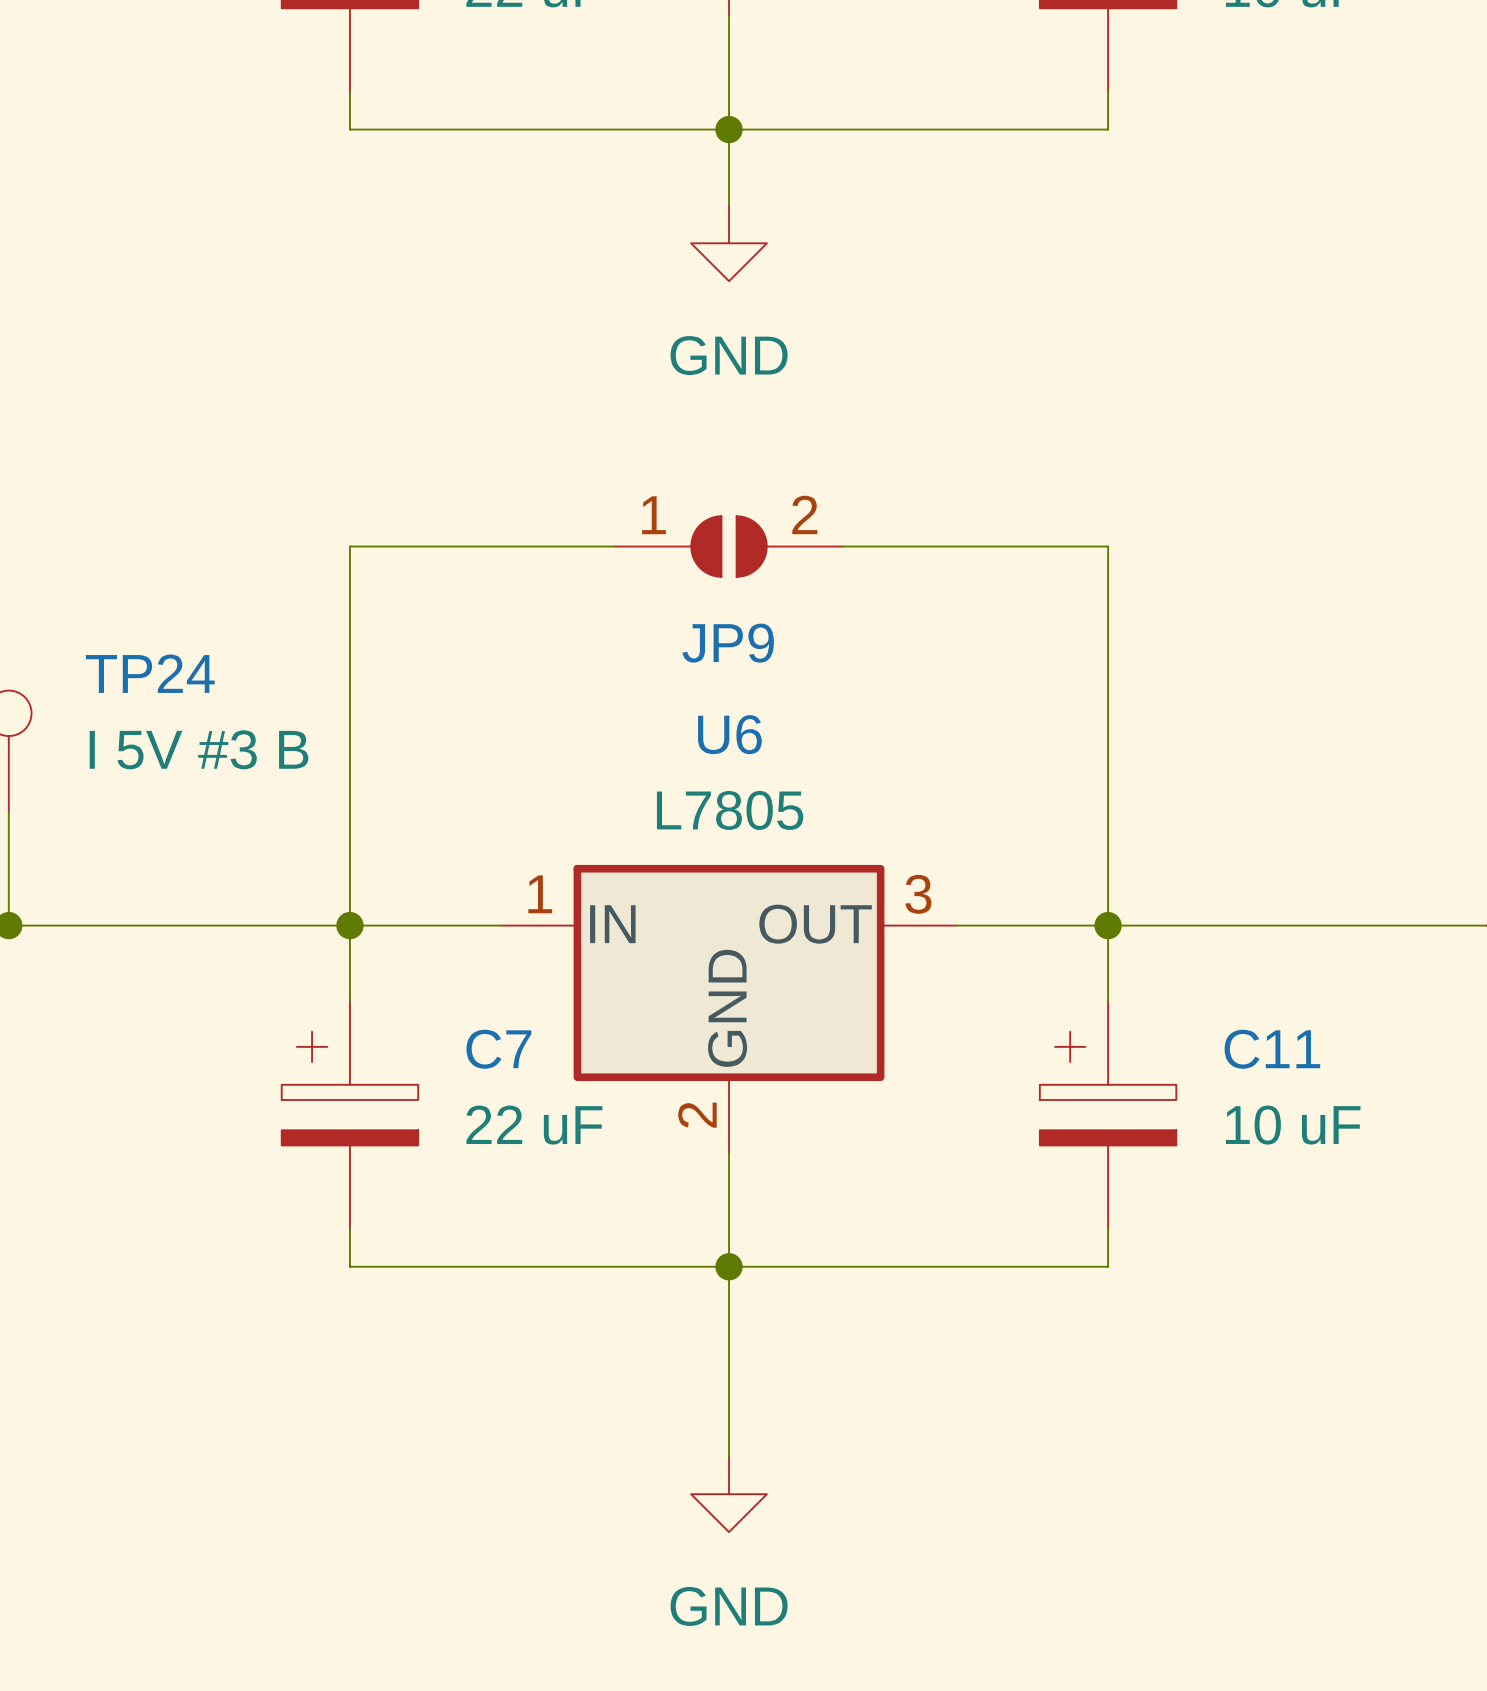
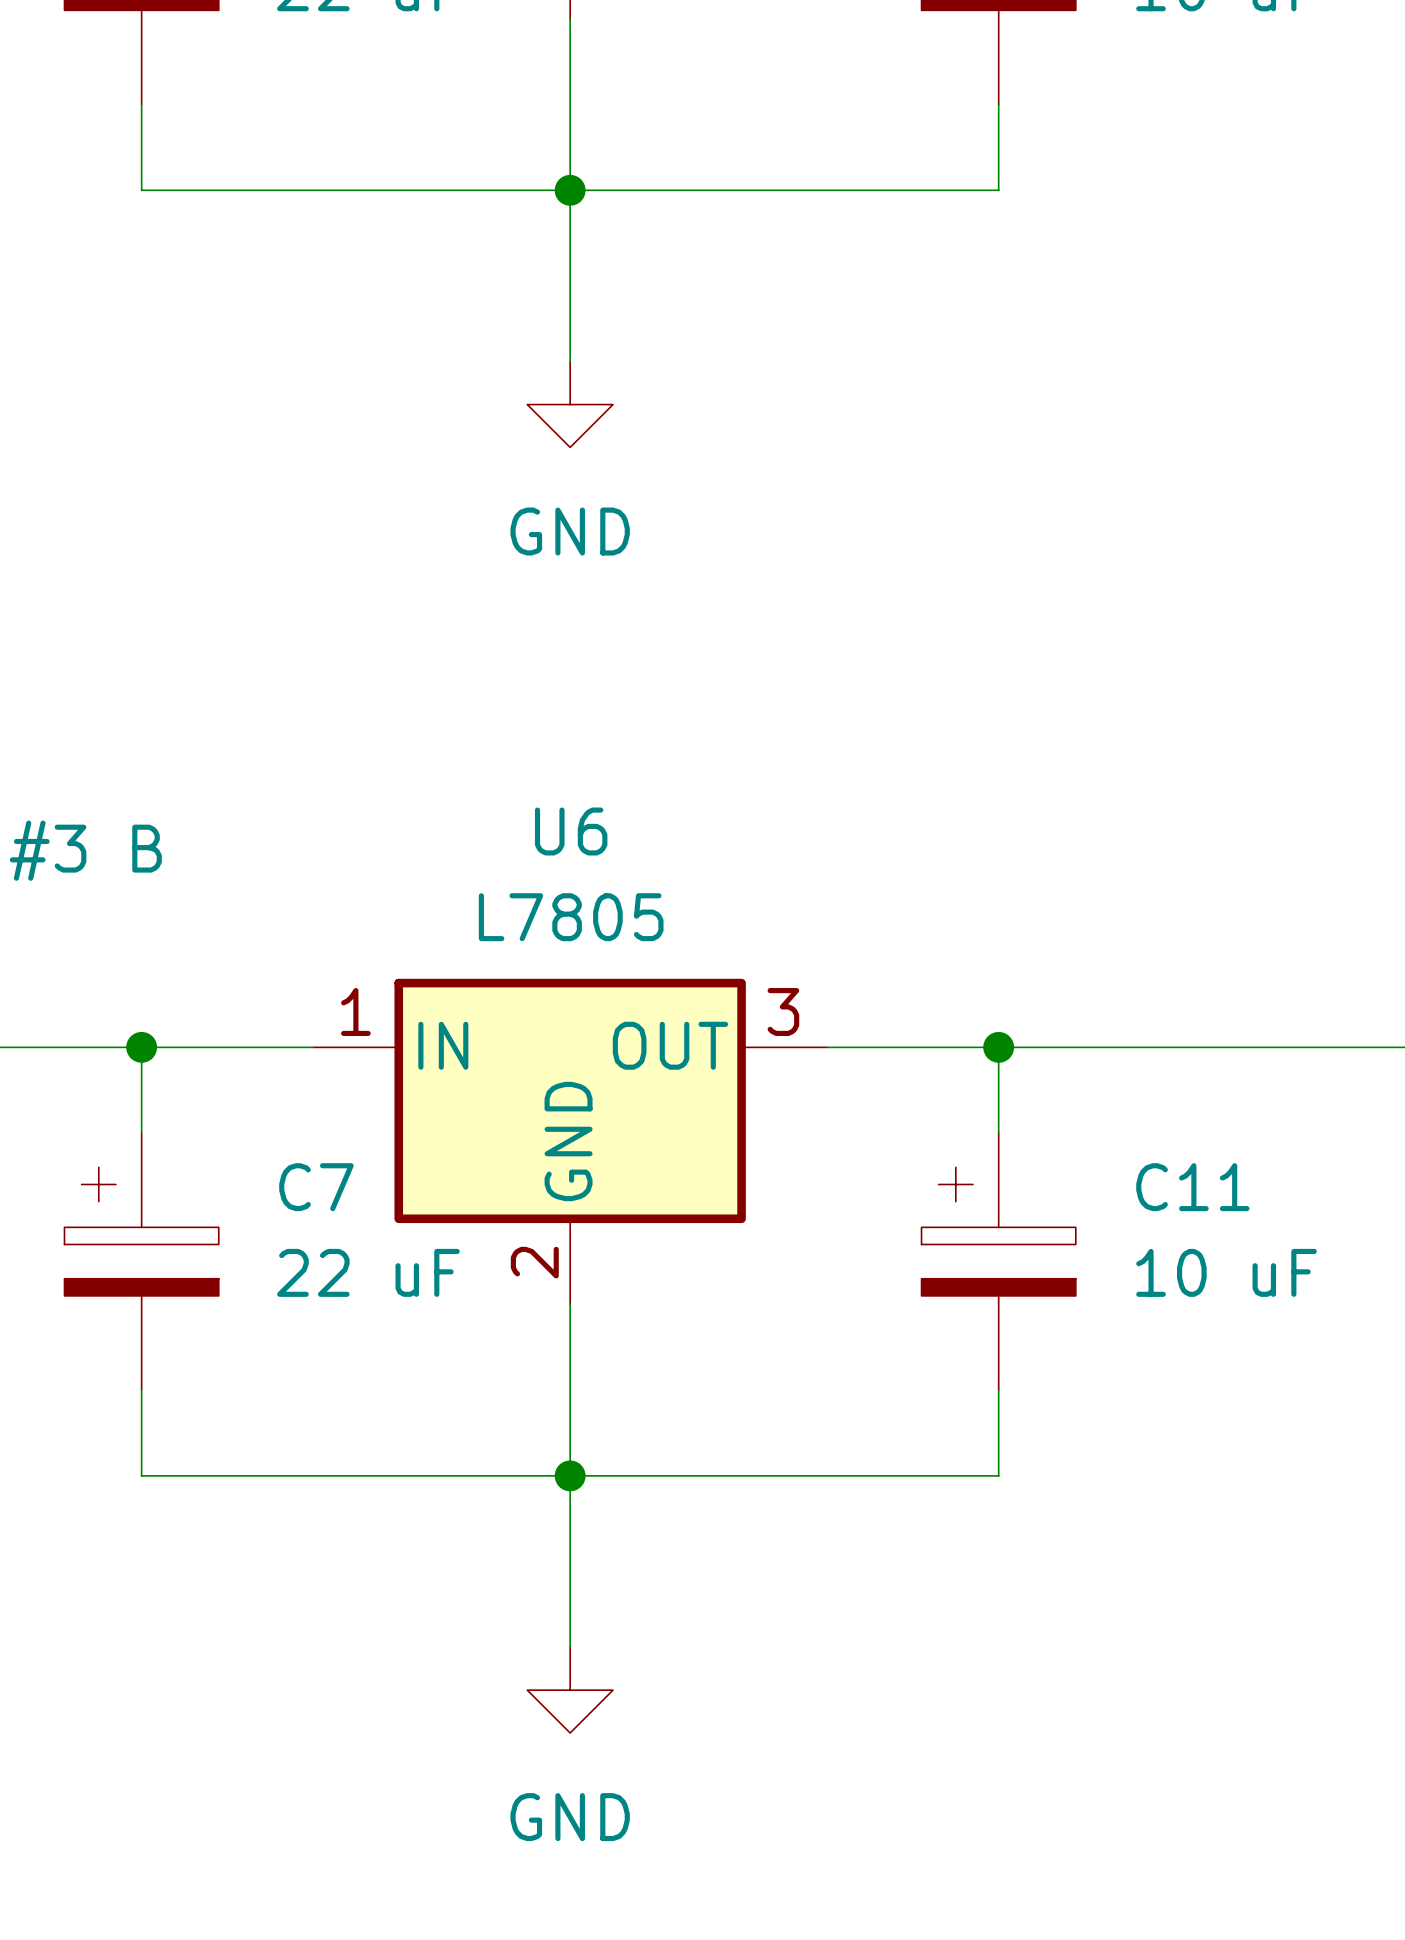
wire: (349, 129) (1108, 129) -> (141, 147) (141, 190) (998, 190) (998, 147)
junction position: (729, 129) -> (570, 190)
wire: none -> (570, 233) (570, 361)
power symbol position: GND (729, 243) -> GND (570, 404)
wire: (615, 546) (349, 546) (349, 925) -> none
JP9: (729, 546) -> none
wire: (842, 546) (1108, 546) (1108, 925) -> none
wire: (349, 1266) (1108, 1266) -> (141, 1433) (141, 1475) (998, 1475) (998, 1433)
junction position: (729, 1266) -> (570, 1475)

